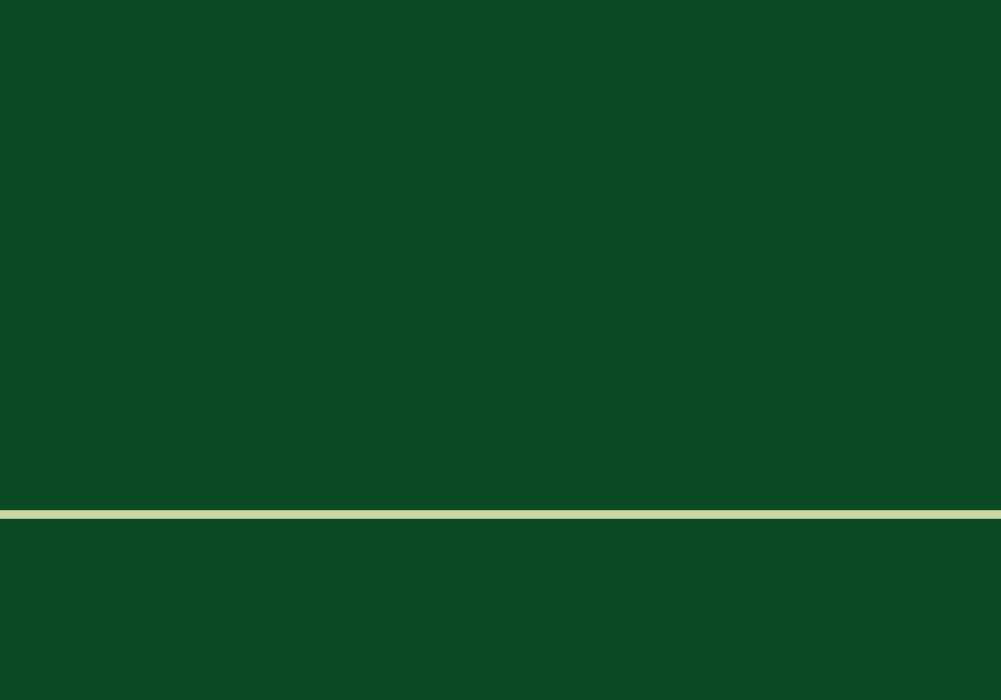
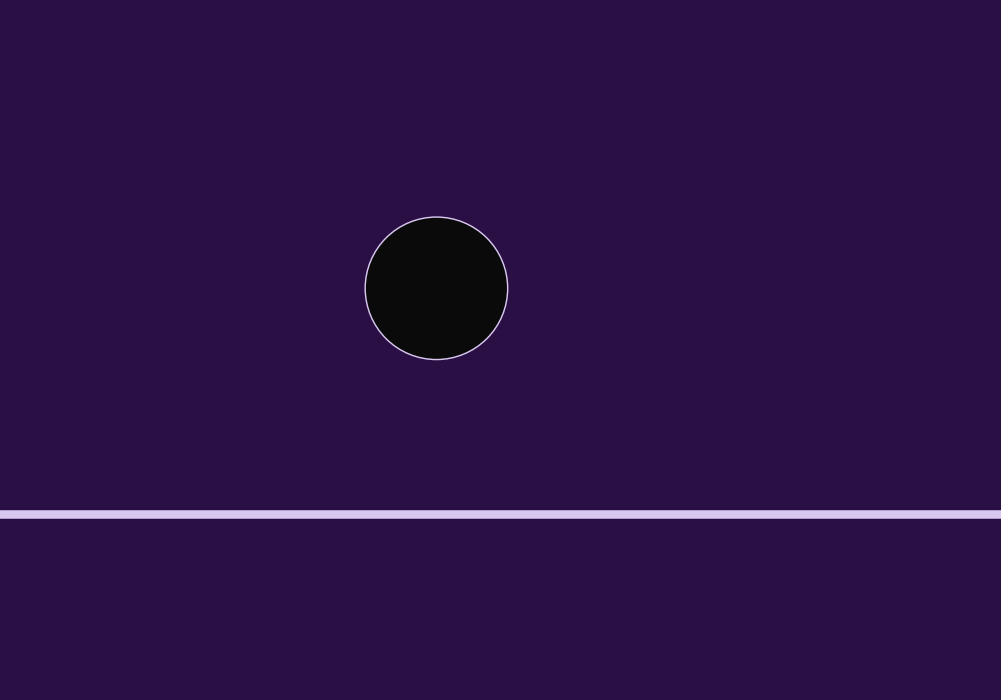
part: none -> (436, 288)

